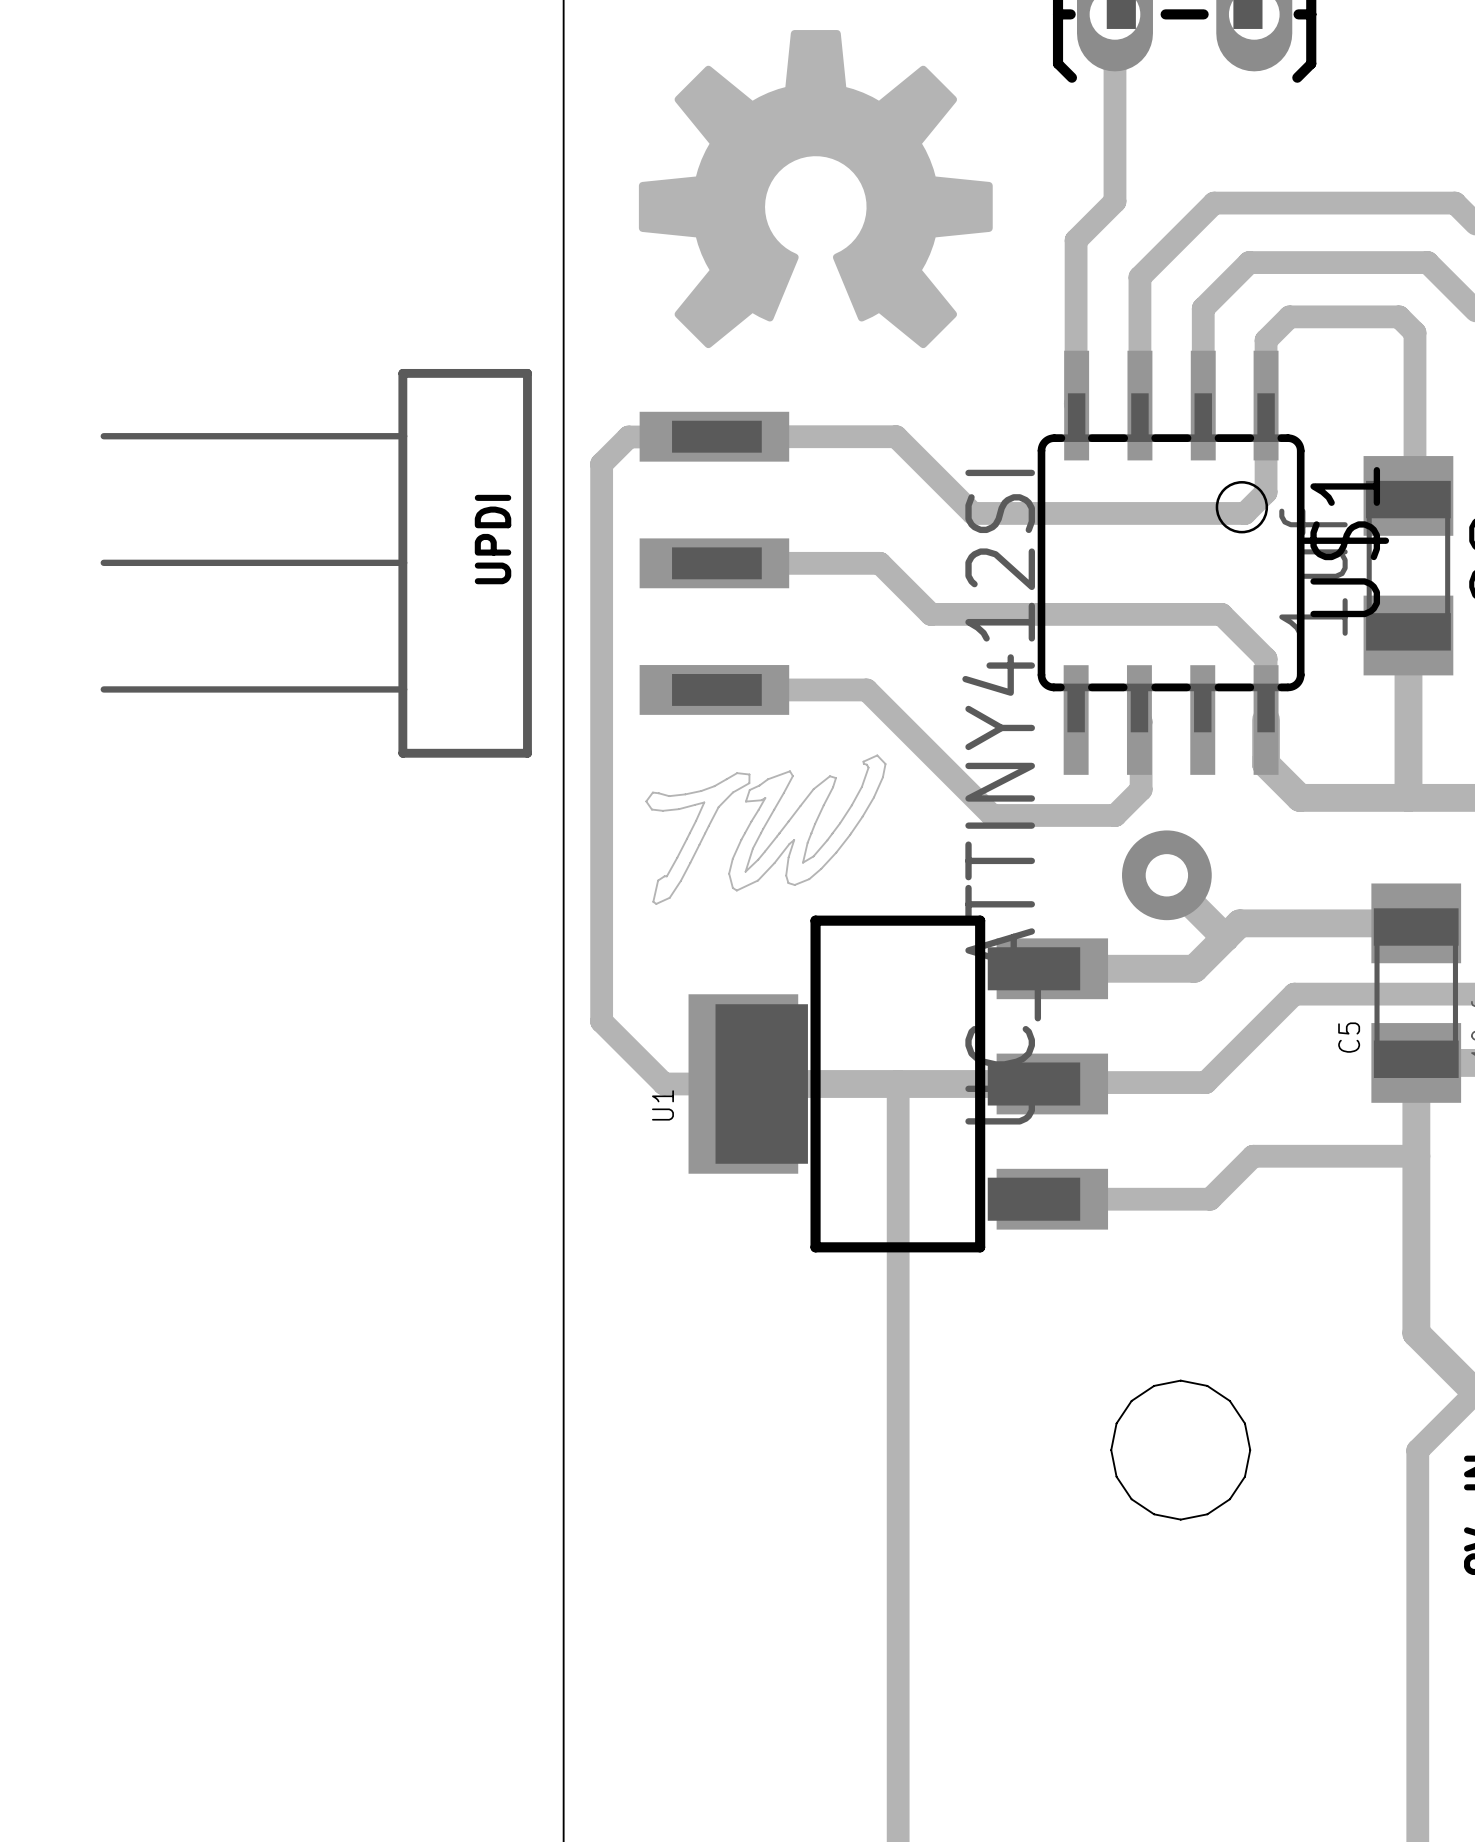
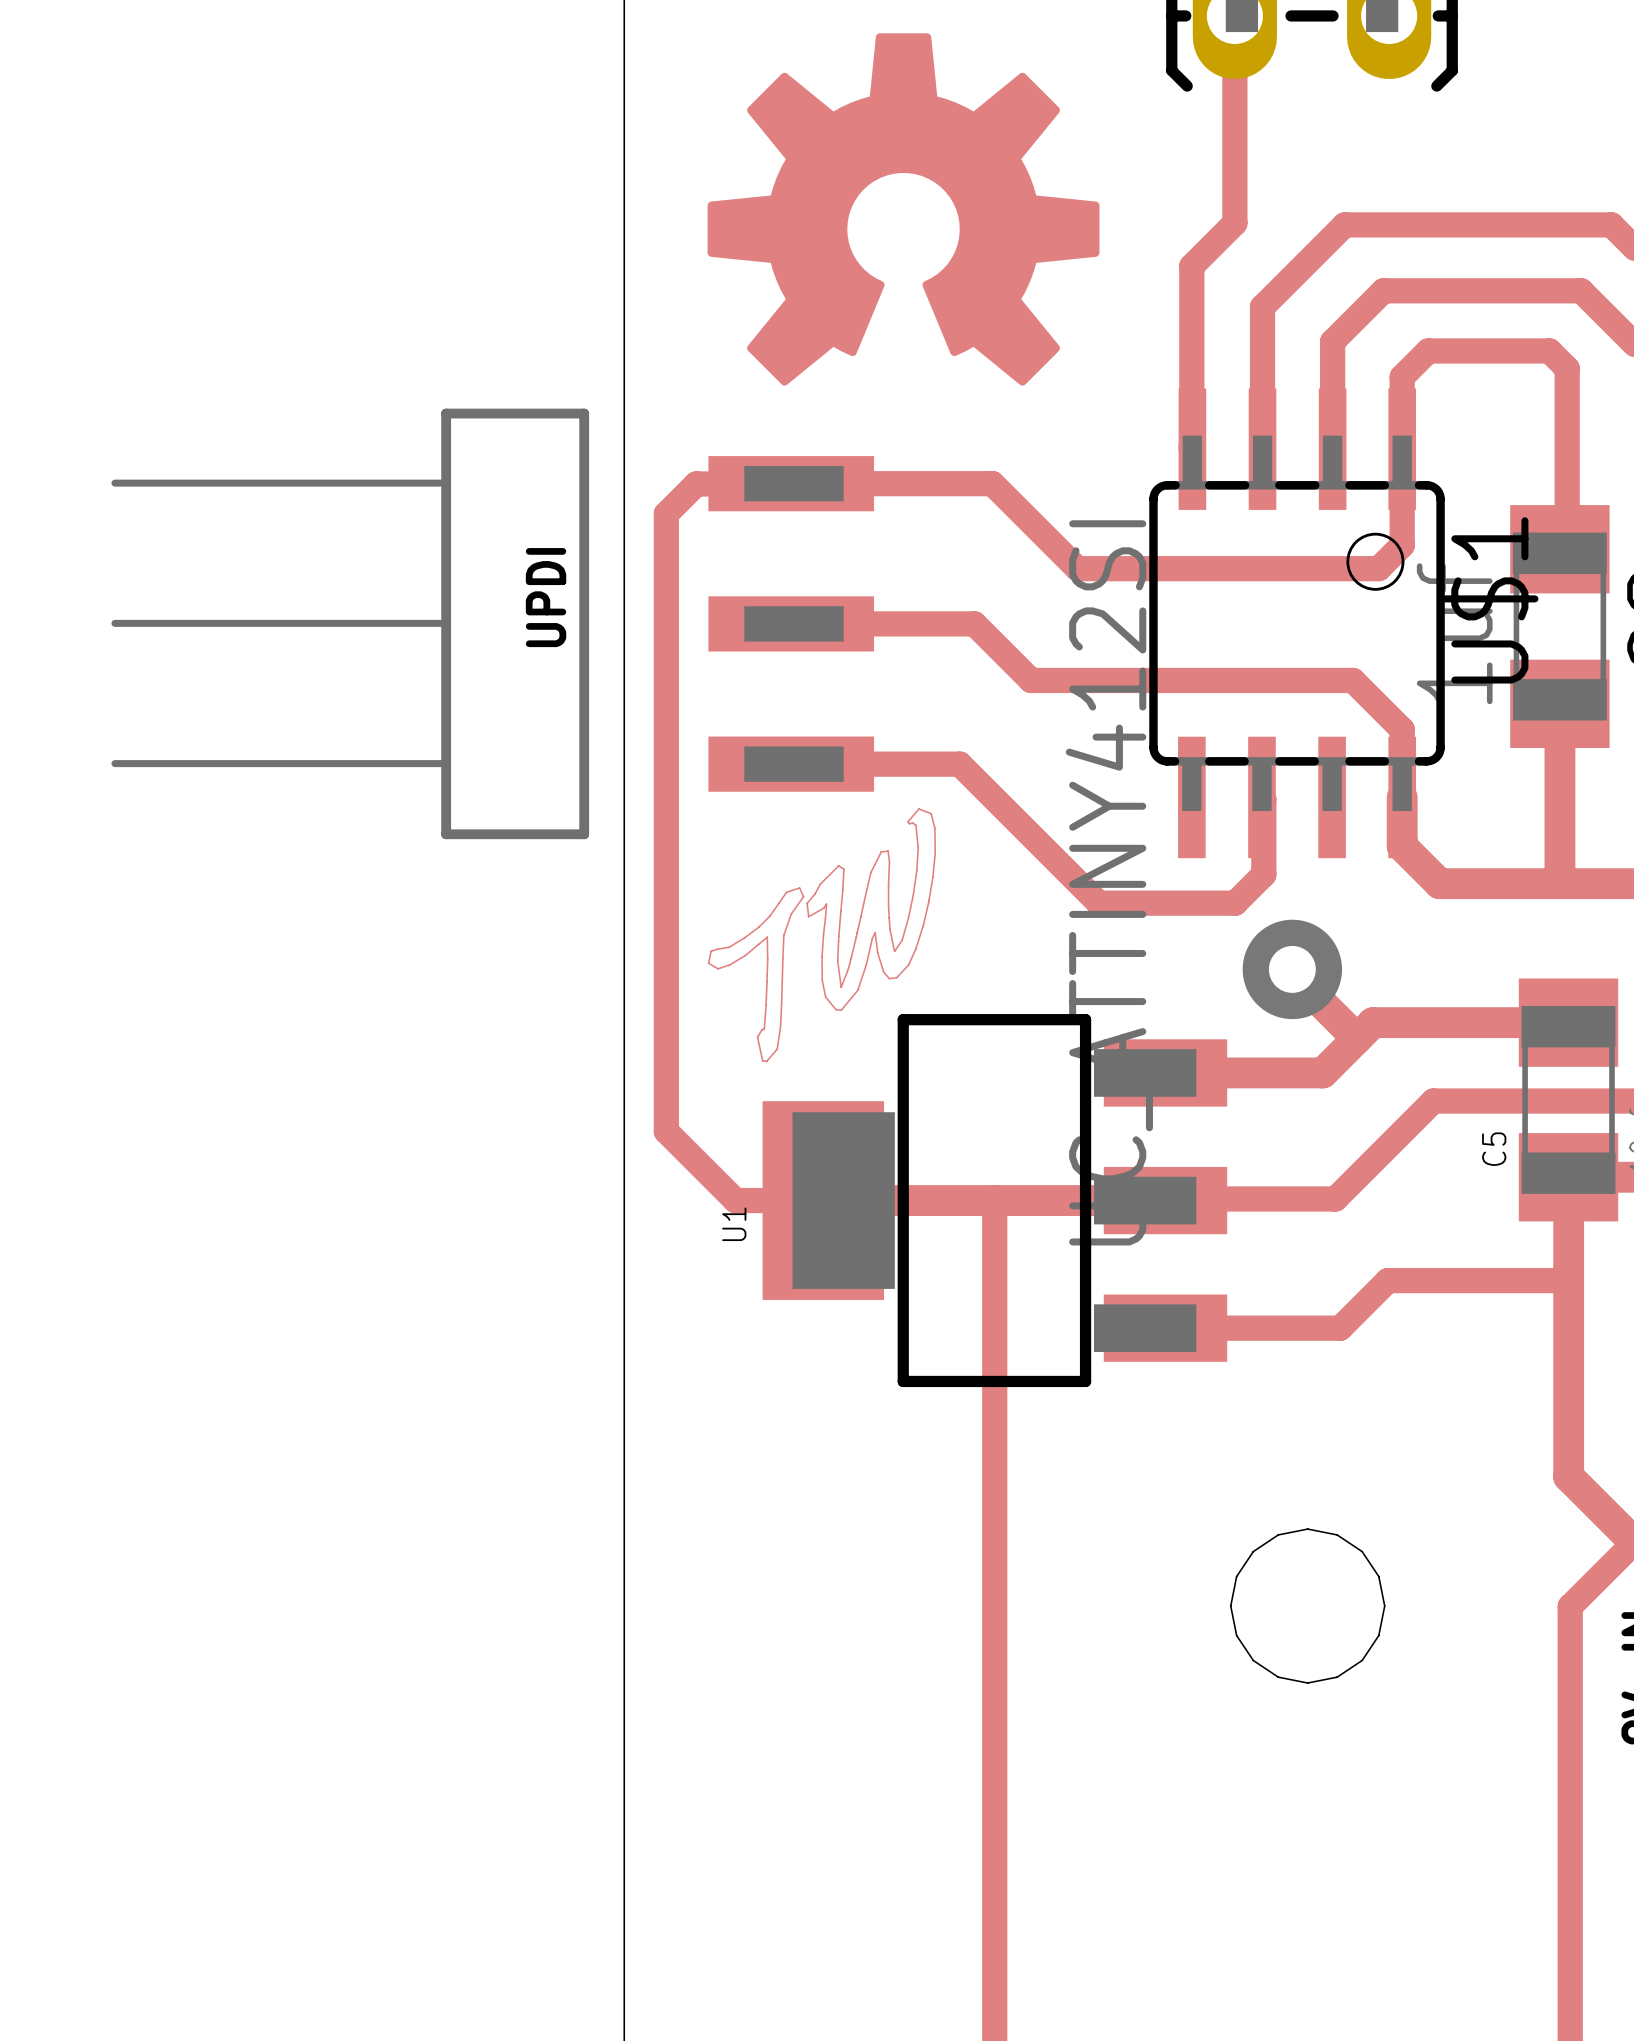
track: (737, 773) (714, 786) (701, 790) (669, 796) (652, 792) (646, 801) (651, 809) (662, 810) (679, 809) (704, 802) (666, 876) (658, 880) (653, 901) (656, 903) (669, 897) (680, 880) (718, 807) (732, 792) (749, 783) (749, 774) (737, 773) -> none
track: none -> (799, 887) (803, 896) (791, 913) (783, 935) (780, 1026) (777, 1049) (766, 1061) (762, 1060) (757, 1037) (764, 1028) (767, 937) (745, 955) (729, 964) (718, 968) (708, 963) (711, 951) (729, 947) (744, 937) (769, 916) (786, 892) (799, 887)
track: (832, 833) (861, 786) (868, 767) (863, 761) (877, 755) (885, 764) (882, 777) (873, 797) (850, 835) (821, 868) (809, 879) (794, 884) (788, 883) (786, 875) (788, 857) (794, 840) (758, 880) (736, 890) (732, 887) (729, 873) (732, 858) (765, 798) (761, 800) (745, 801) (749, 790) (767, 779) (790, 771) (792, 776) (752, 848) (745, 871) (765, 851) (813, 789) (829, 776) (835, 778) (807, 842) (803, 862) (813, 856) (832, 833) -> (918, 809) (908, 821) (915, 825) (918, 847) (913, 894) (902, 940) (894, 951) (889, 929) (888, 851) (881, 852) (870, 872) (851, 957) (841, 987) (837, 960) (843, 869) (838, 865) (820, 884) (807, 903) (808, 916) (823, 908) (826, 904) (822, 957) (822, 980) (825, 997) (836, 1009) (841, 1010) (857, 990) (875, 932) (877, 952) (883, 972) (889, 978) (896, 977) (908, 965) (915, 949) (928, 901) (935, 852) (934, 828) (931, 813) (918, 809)

